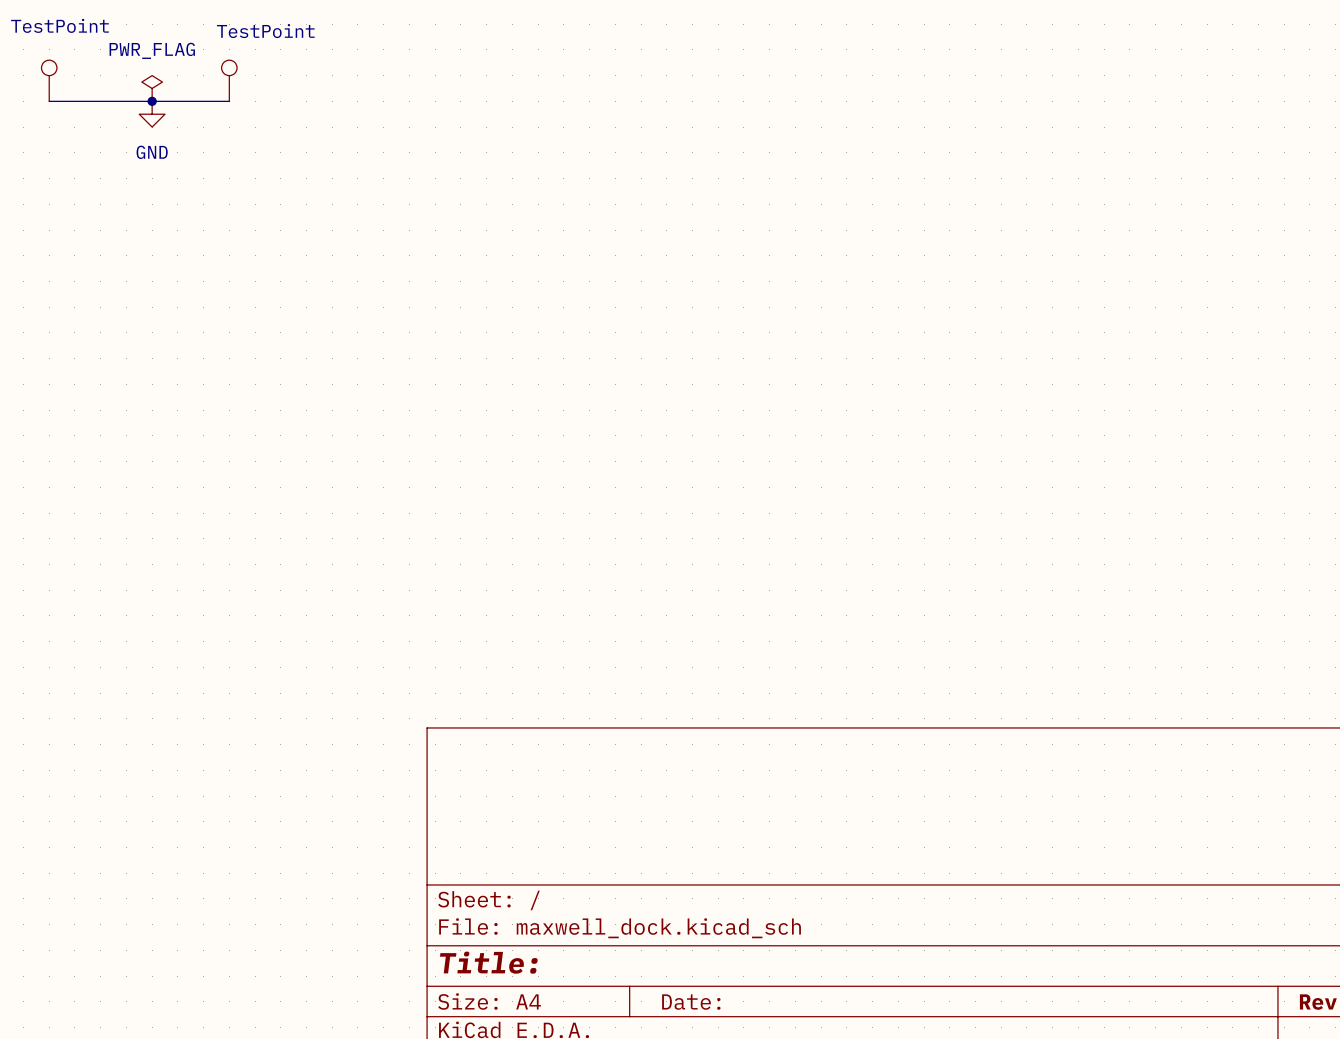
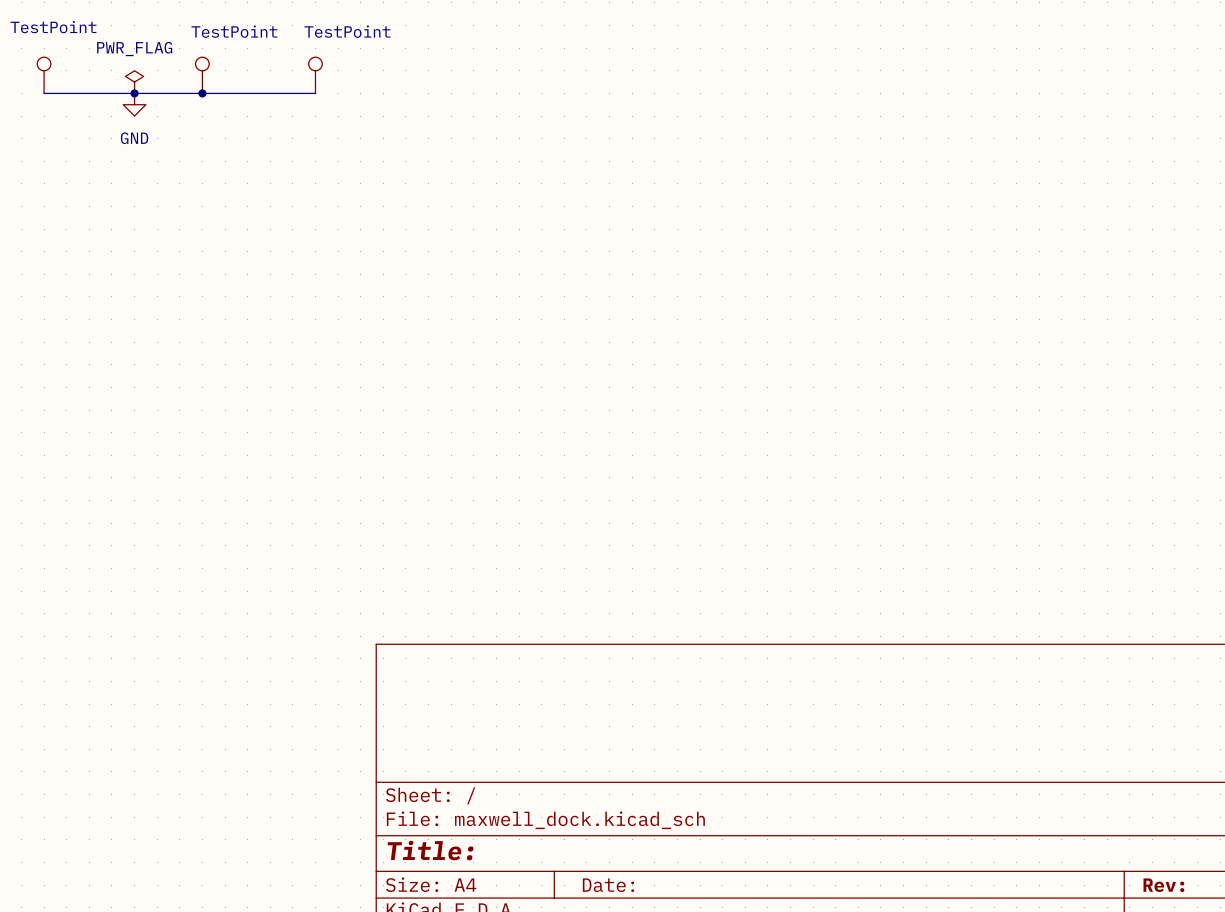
part: none -> TestPoint (315, 75)
wire: none -> (202, 93) (315, 93)
junction: none -> (202, 93)

